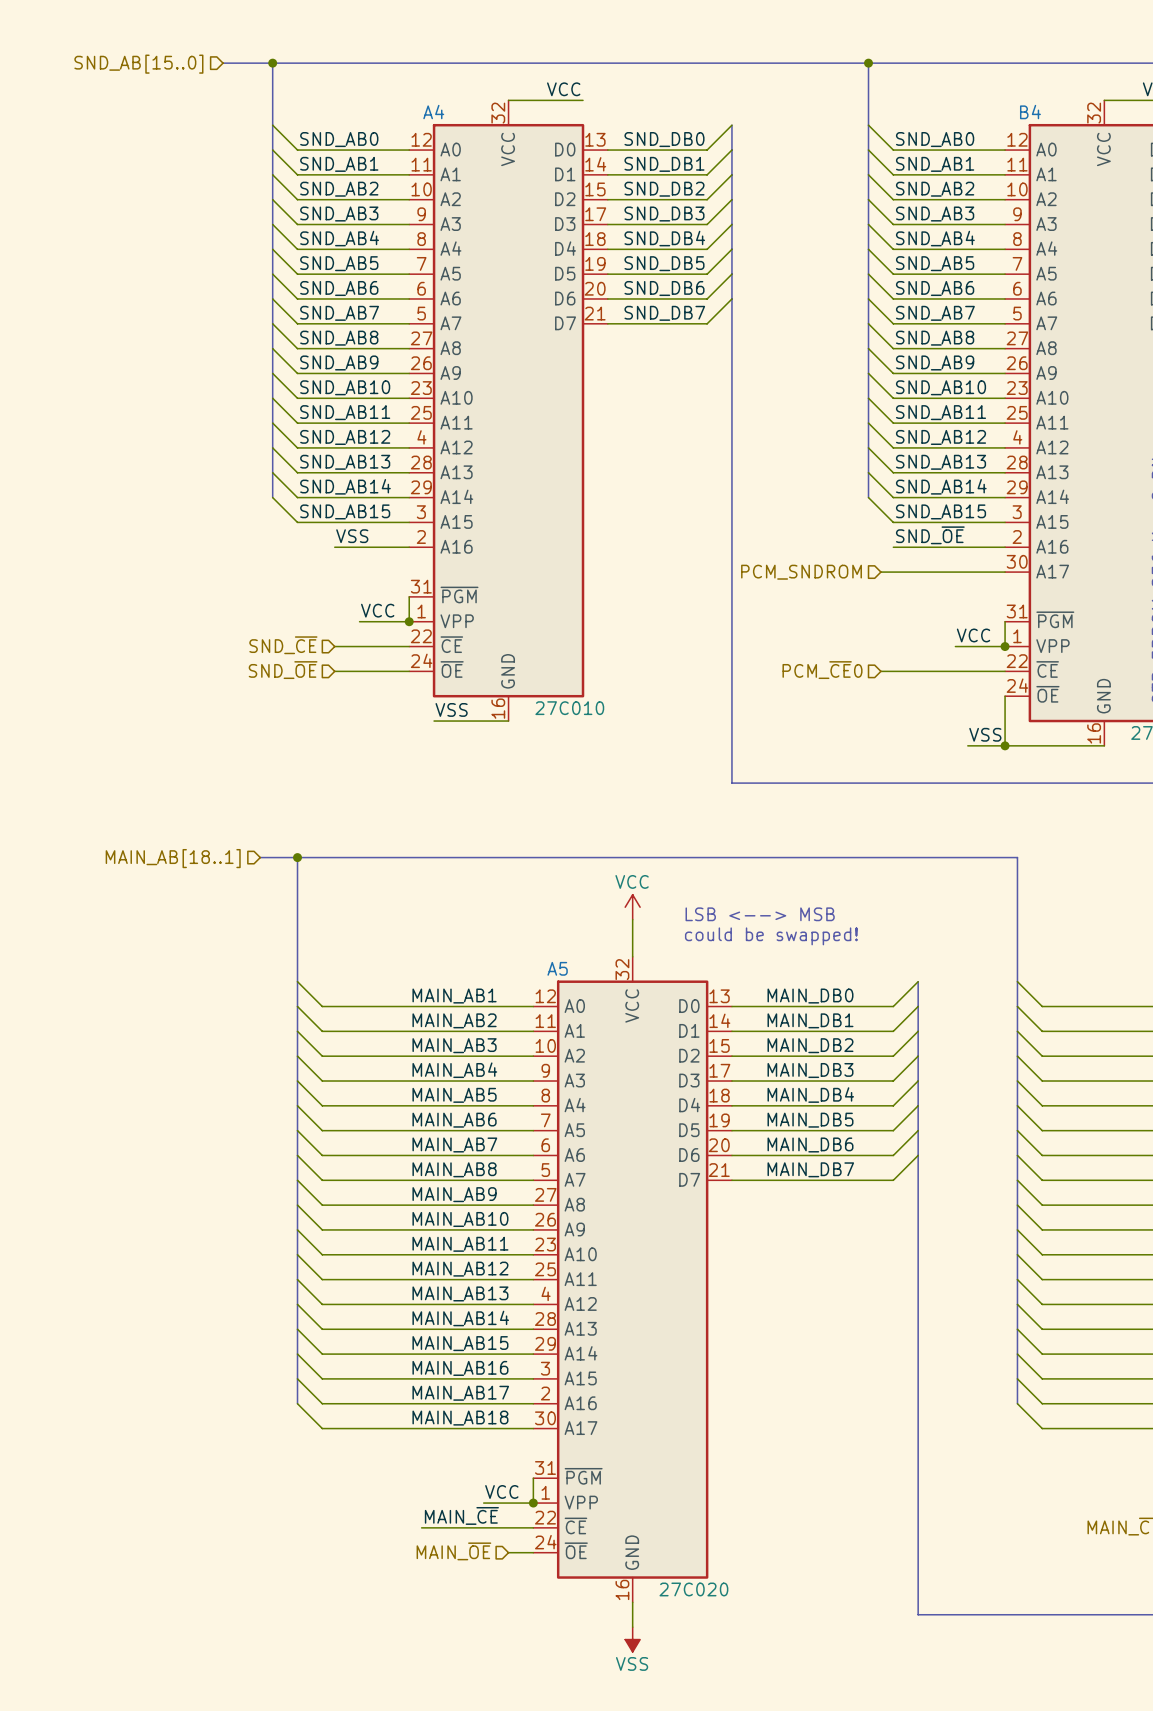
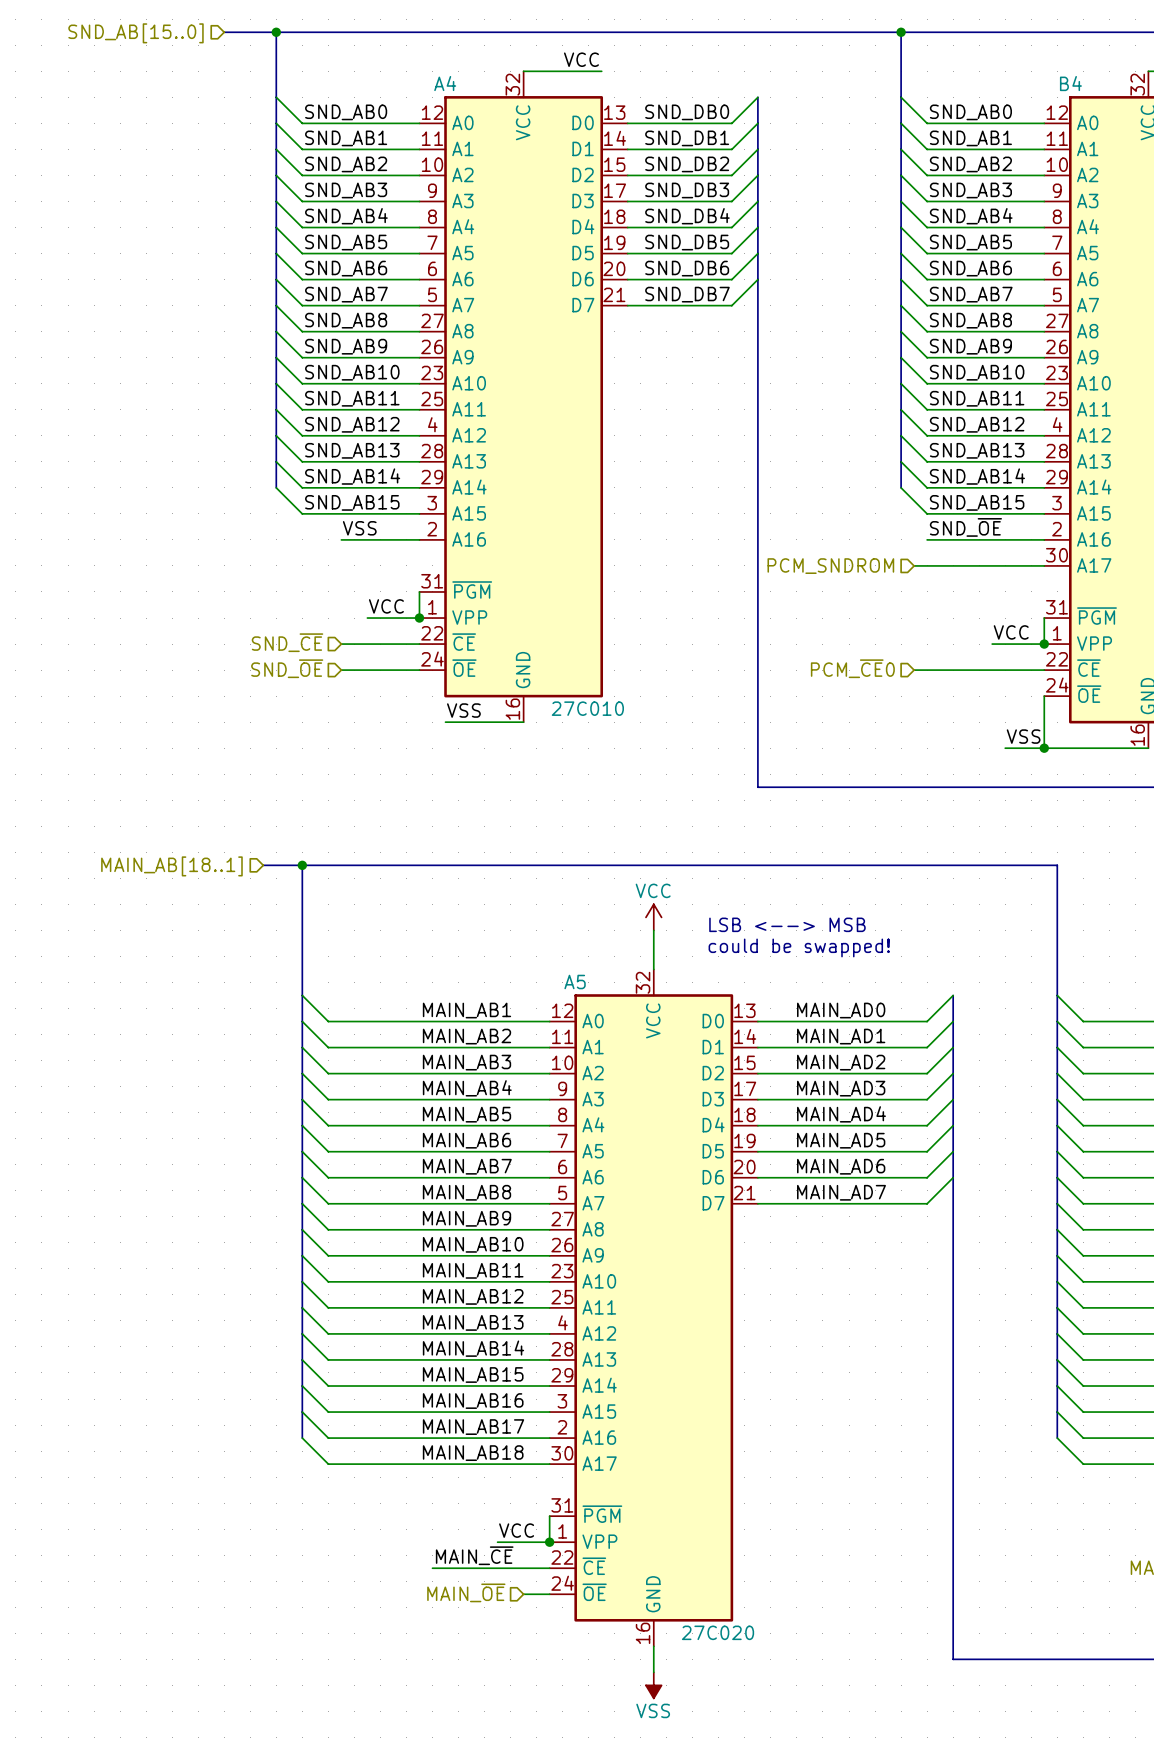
label: MAIN_DB0 (810, 996) -> MAIN_AD0 (841, 1010)
label: MAIN_DB1 (810, 1020) -> MAIN_AD1 (841, 1036)
label: MAIN_DB2 (810, 1045) -> MAIN_AD2 (841, 1062)
label: MAIN_DB3 (810, 1070) -> MAIN_AD3 (841, 1088)
label: MAIN_DB4 (810, 1095) -> MAIN_AD4 (841, 1114)
label: MAIN_DB5 (810, 1120) -> MAIN_AD5 (841, 1140)
label: MAIN_DB6 (810, 1144) -> MAIN_AD6 (841, 1166)
label: MAIN_DB7 (810, 1169) -> MAIN_AD7 (841, 1192)

